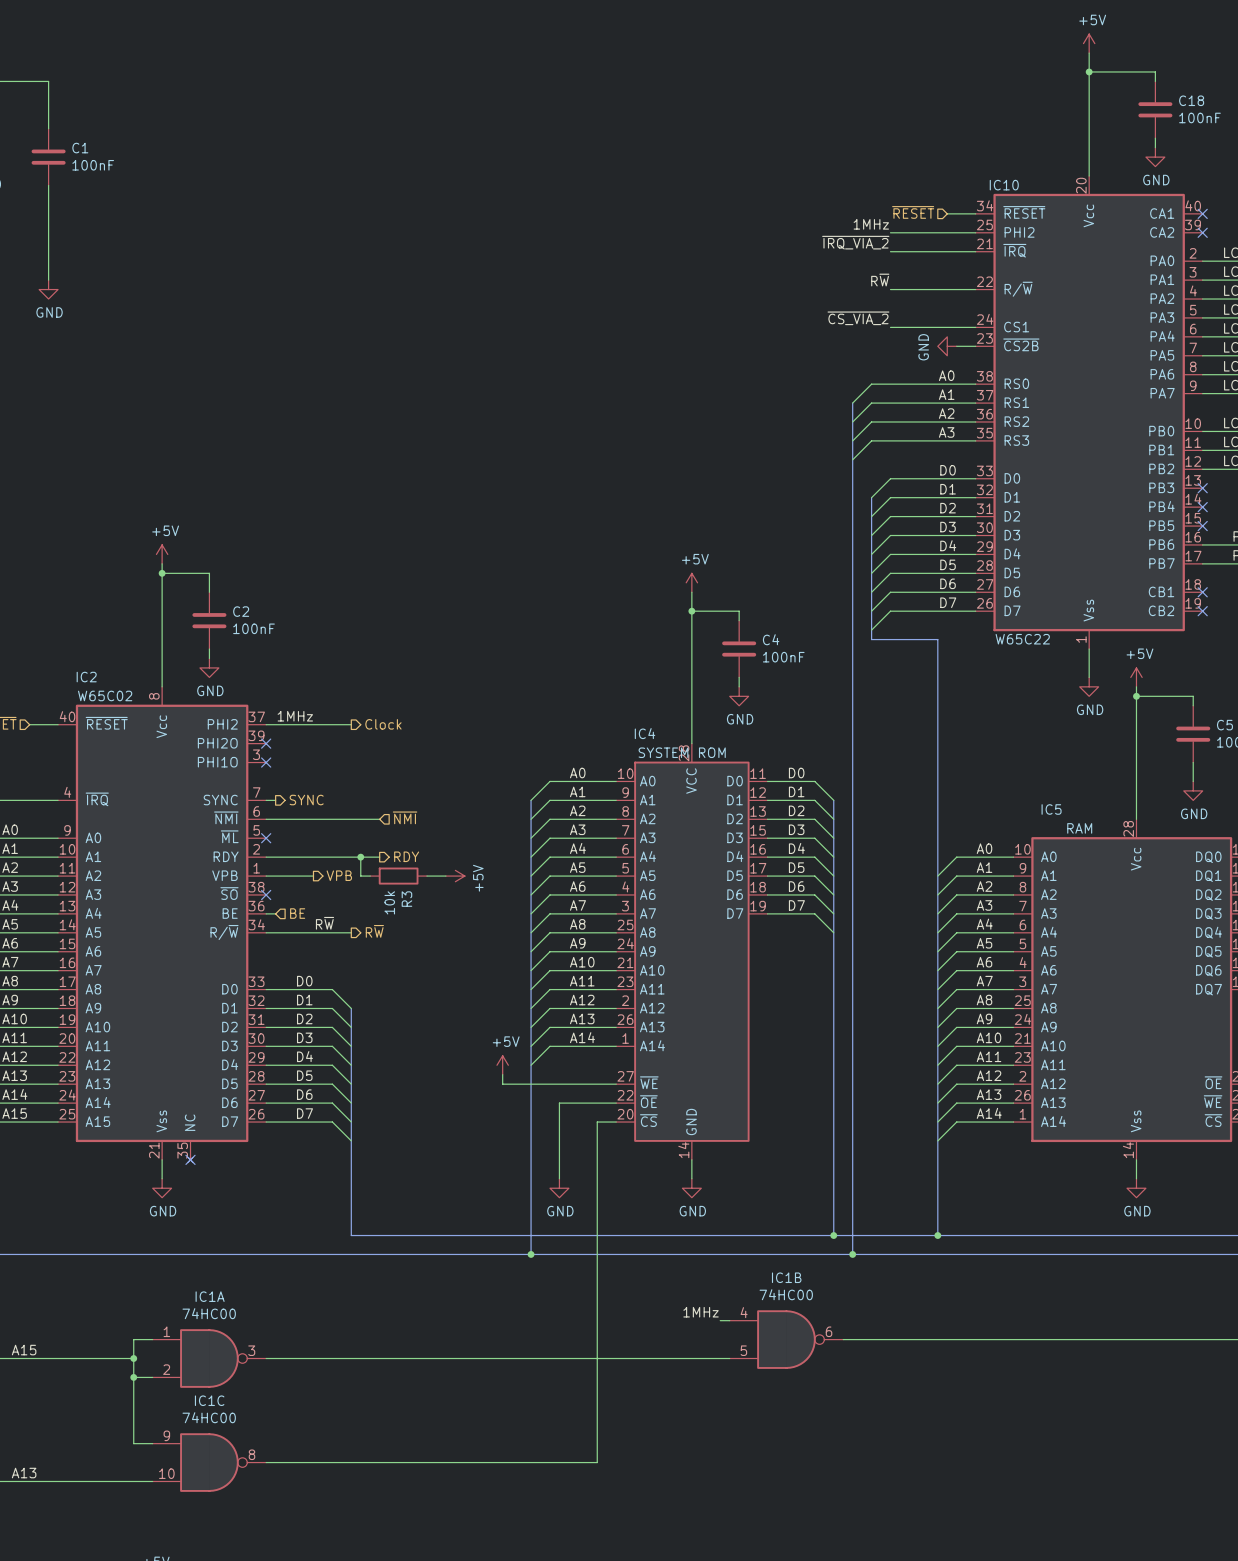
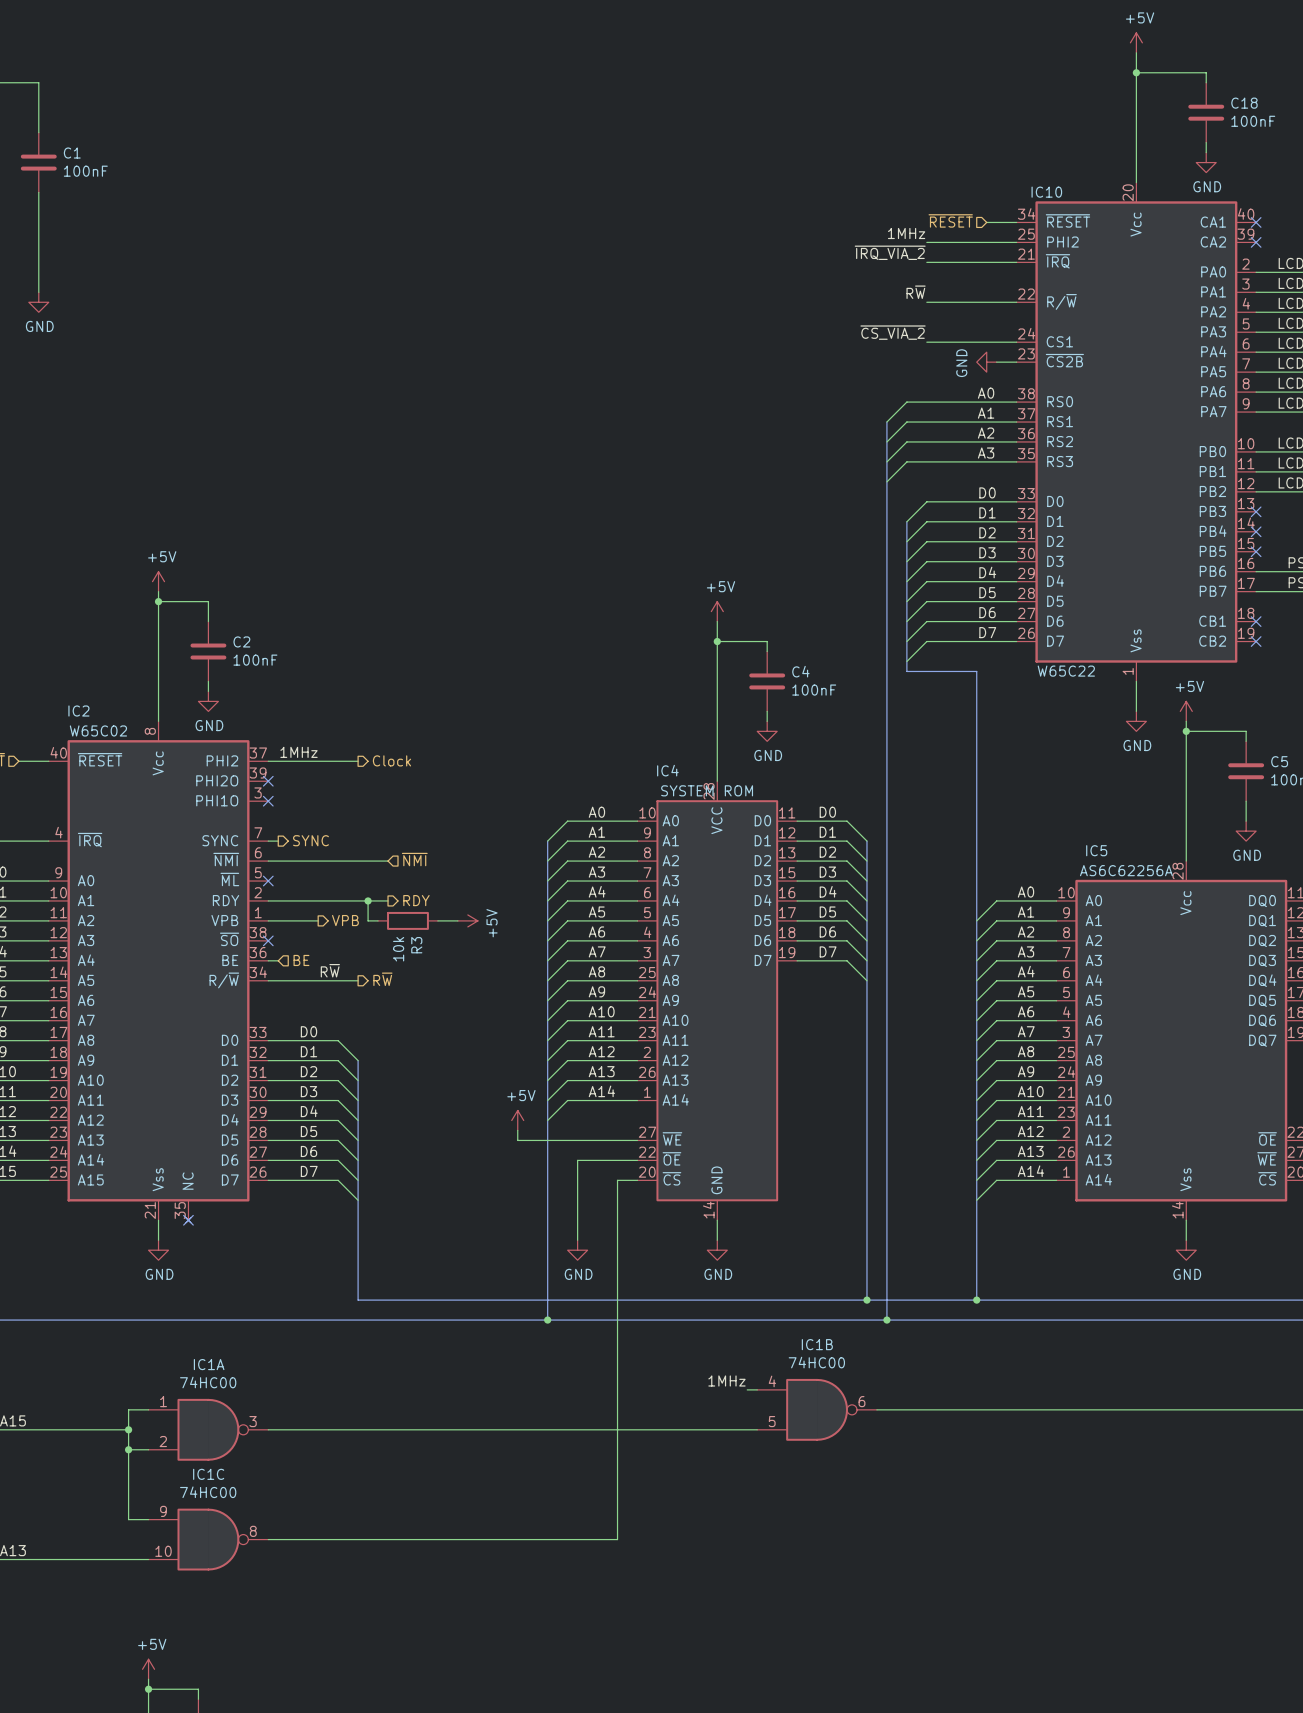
IC5 value: RAM (1079, 828) -> AS6C62256A (1126, 870)

